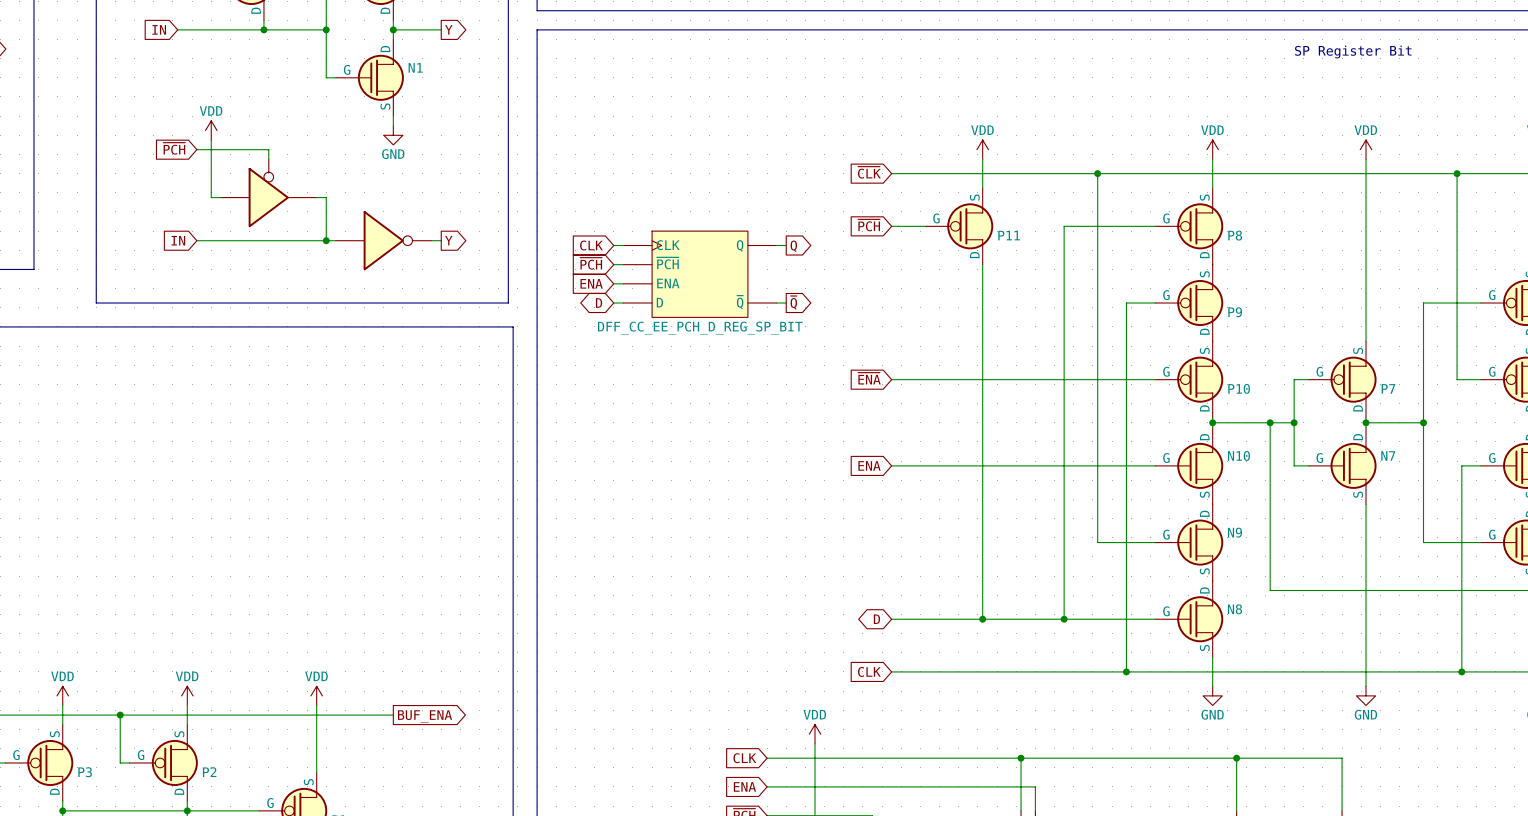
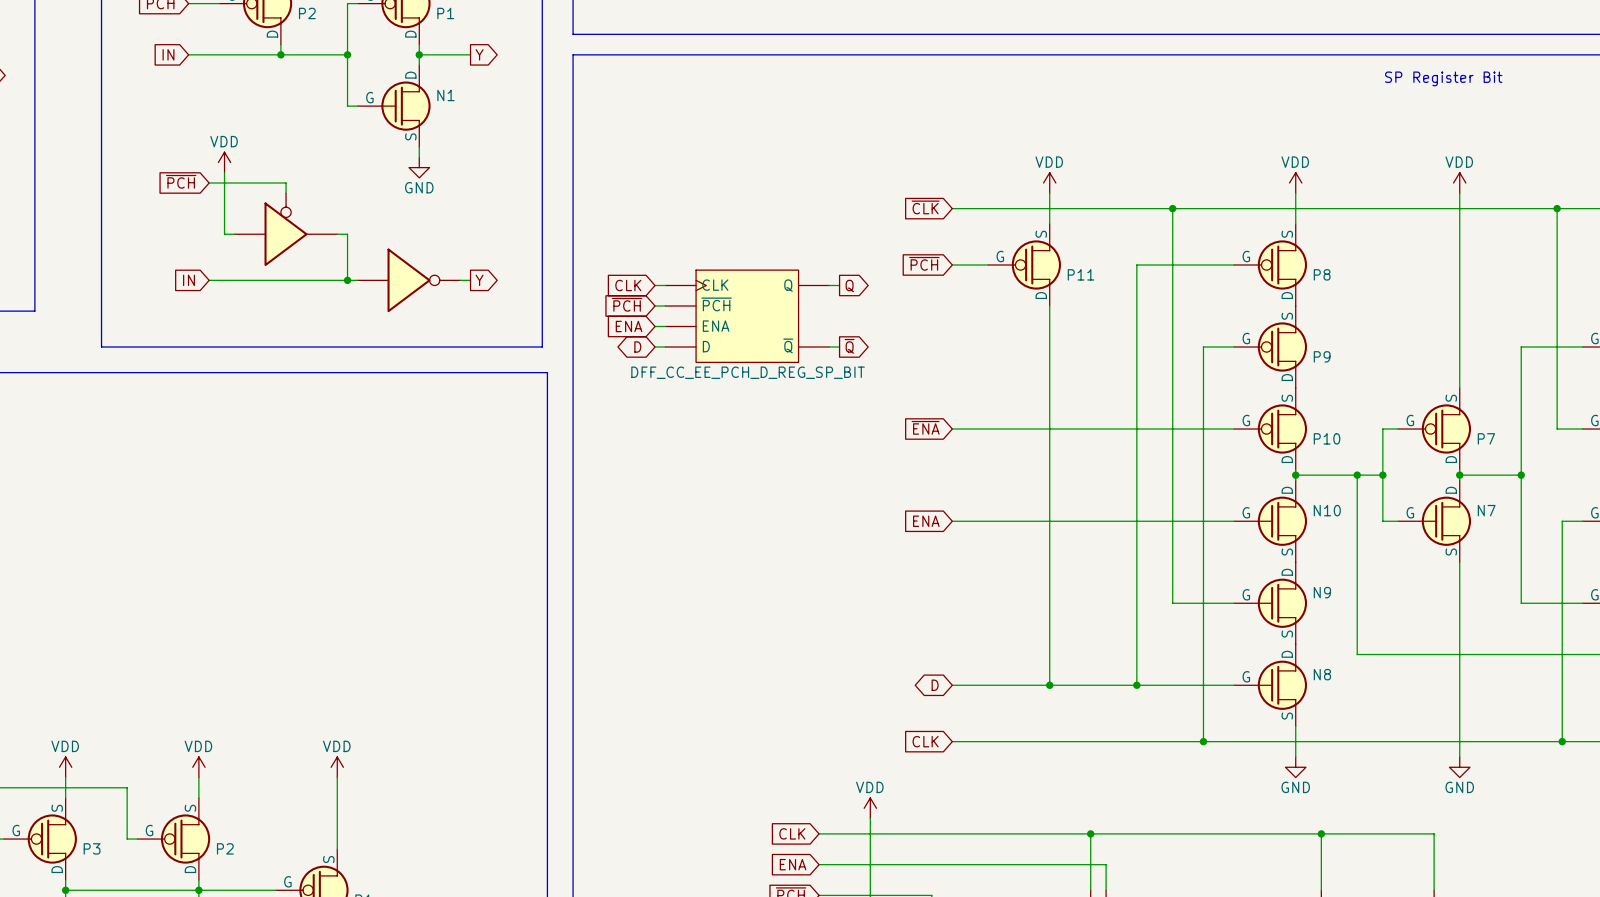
wire: (120, 715) (393, 715) -> none
junction: (120, 715) -> none
global label: BUF_ENA (425, 716) -> none

